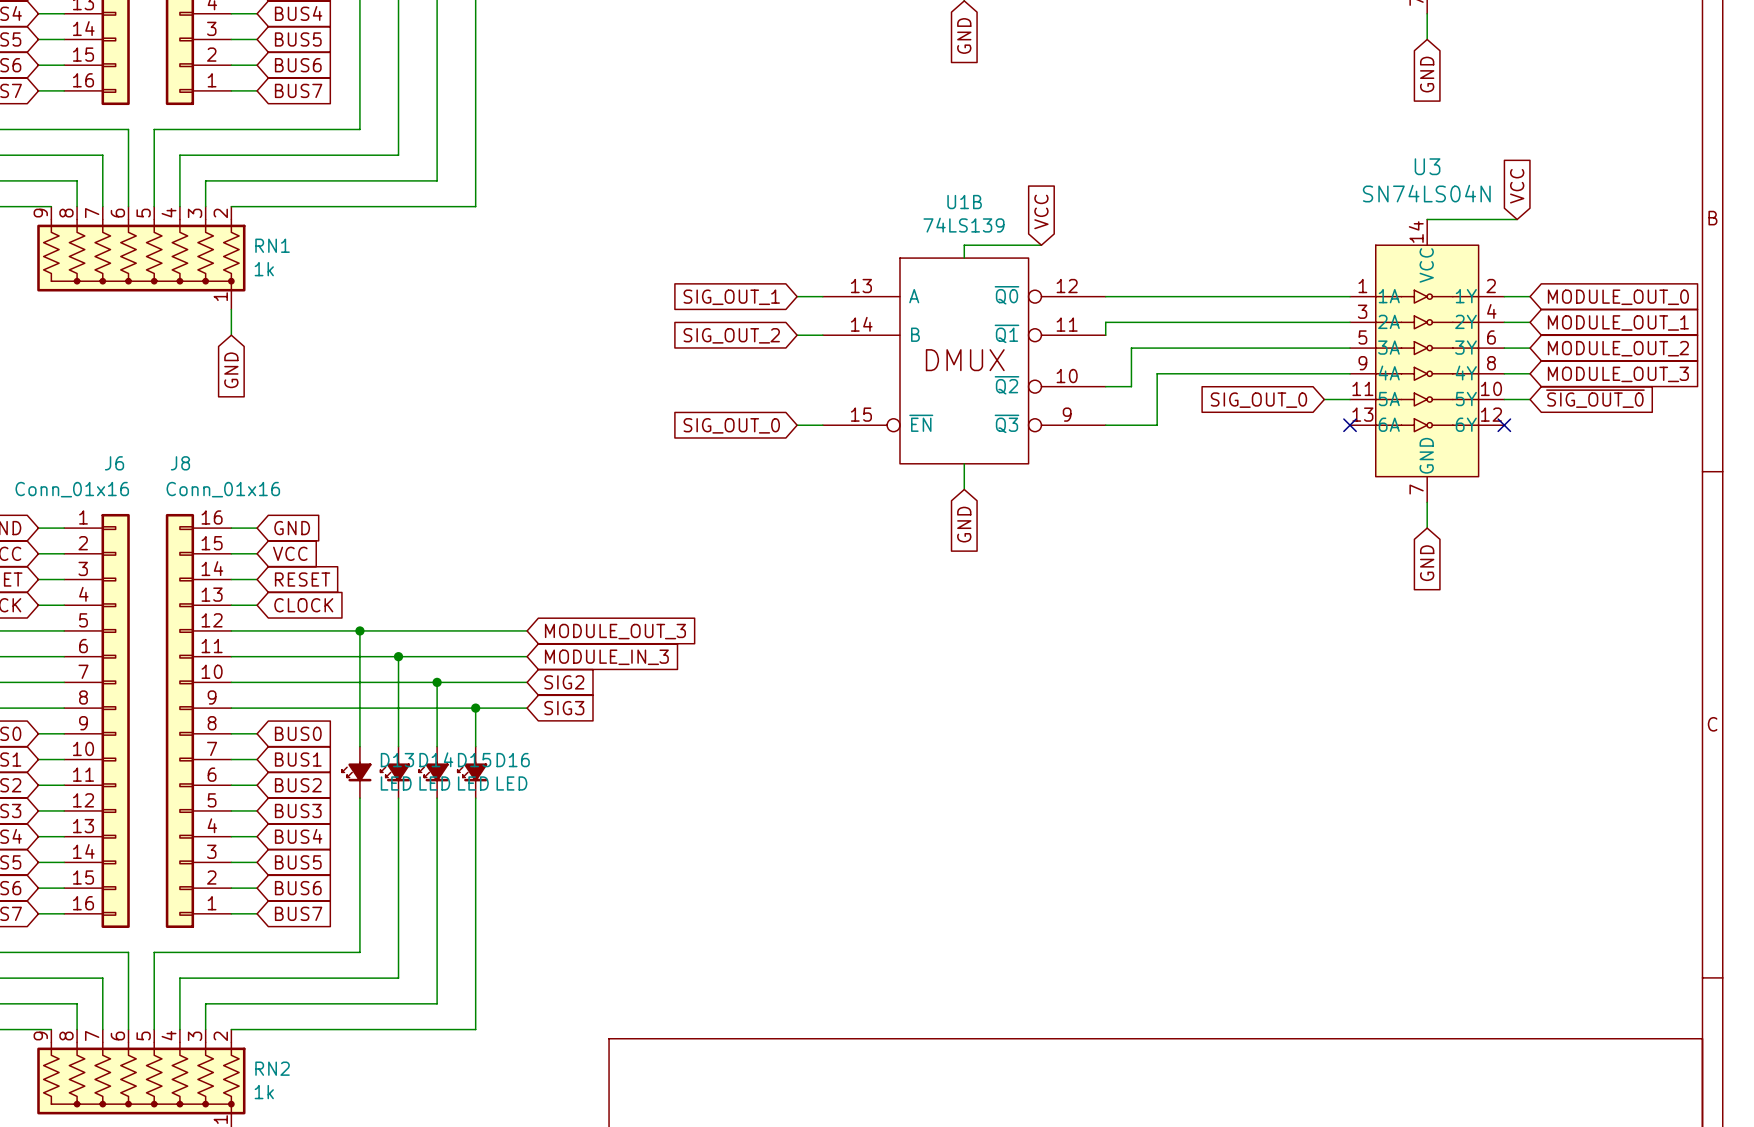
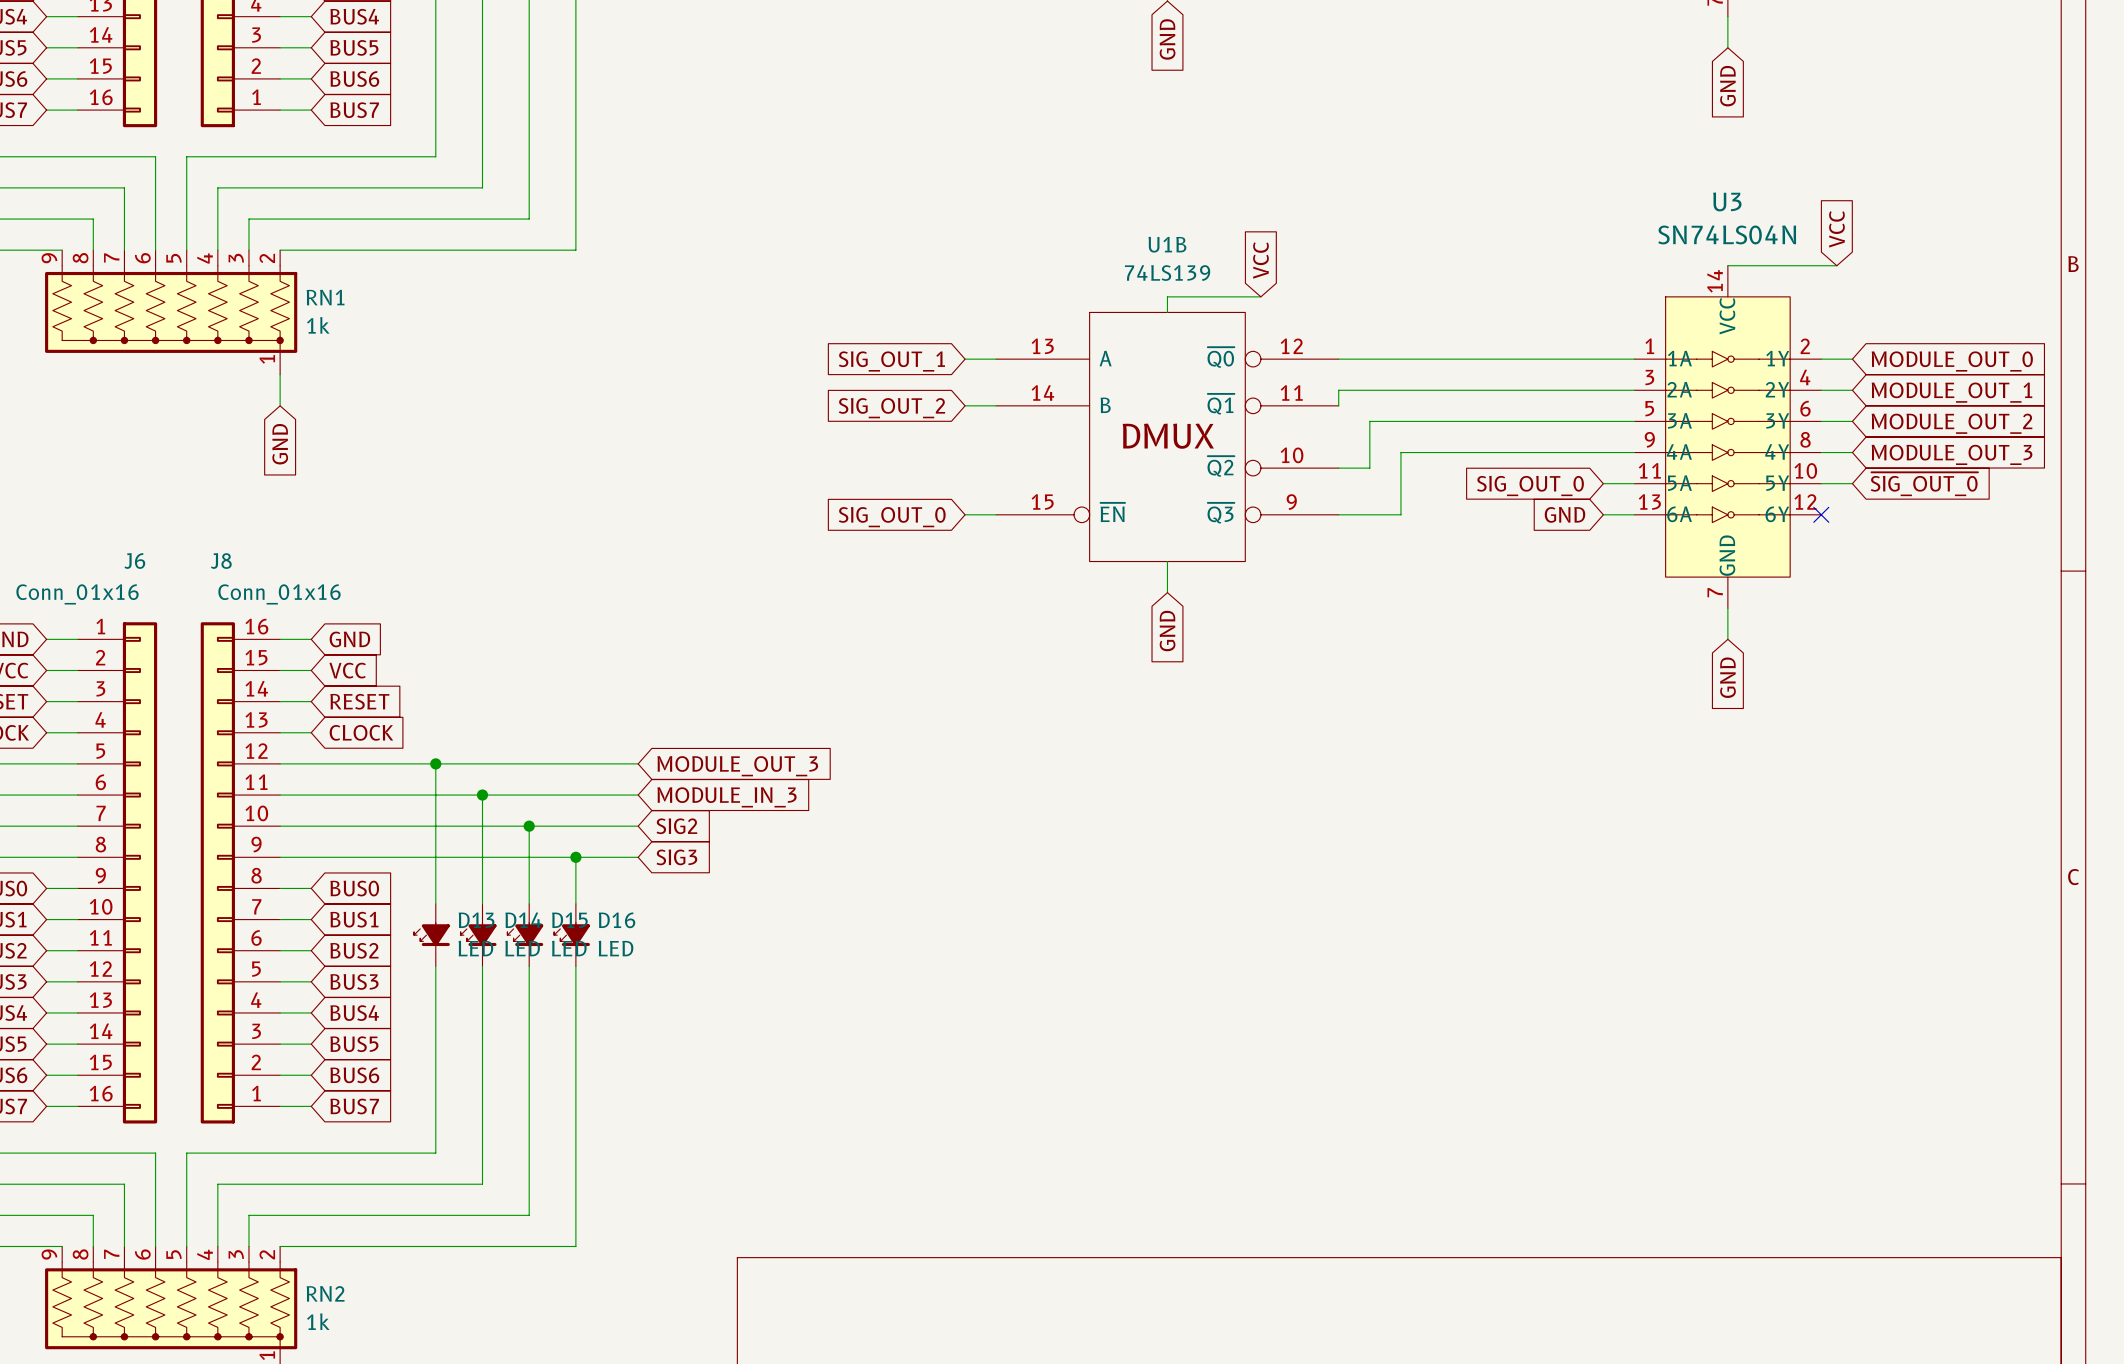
global label: none -> GND (1564, 514)
wire: none -> (1603, 514) (1634, 514)
no-connect mark: (1350, 425) -> none

